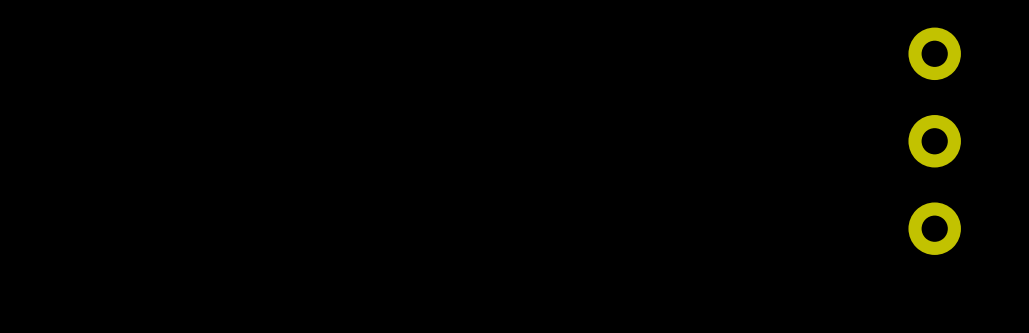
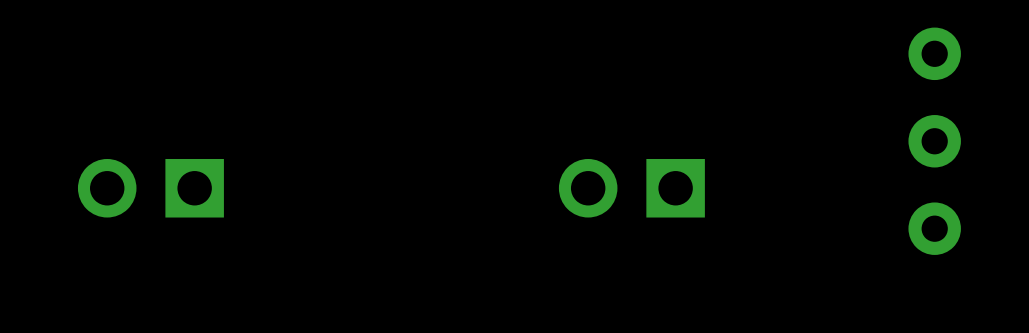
part: none -> (150, 188)
part: none -> (631, 188)

